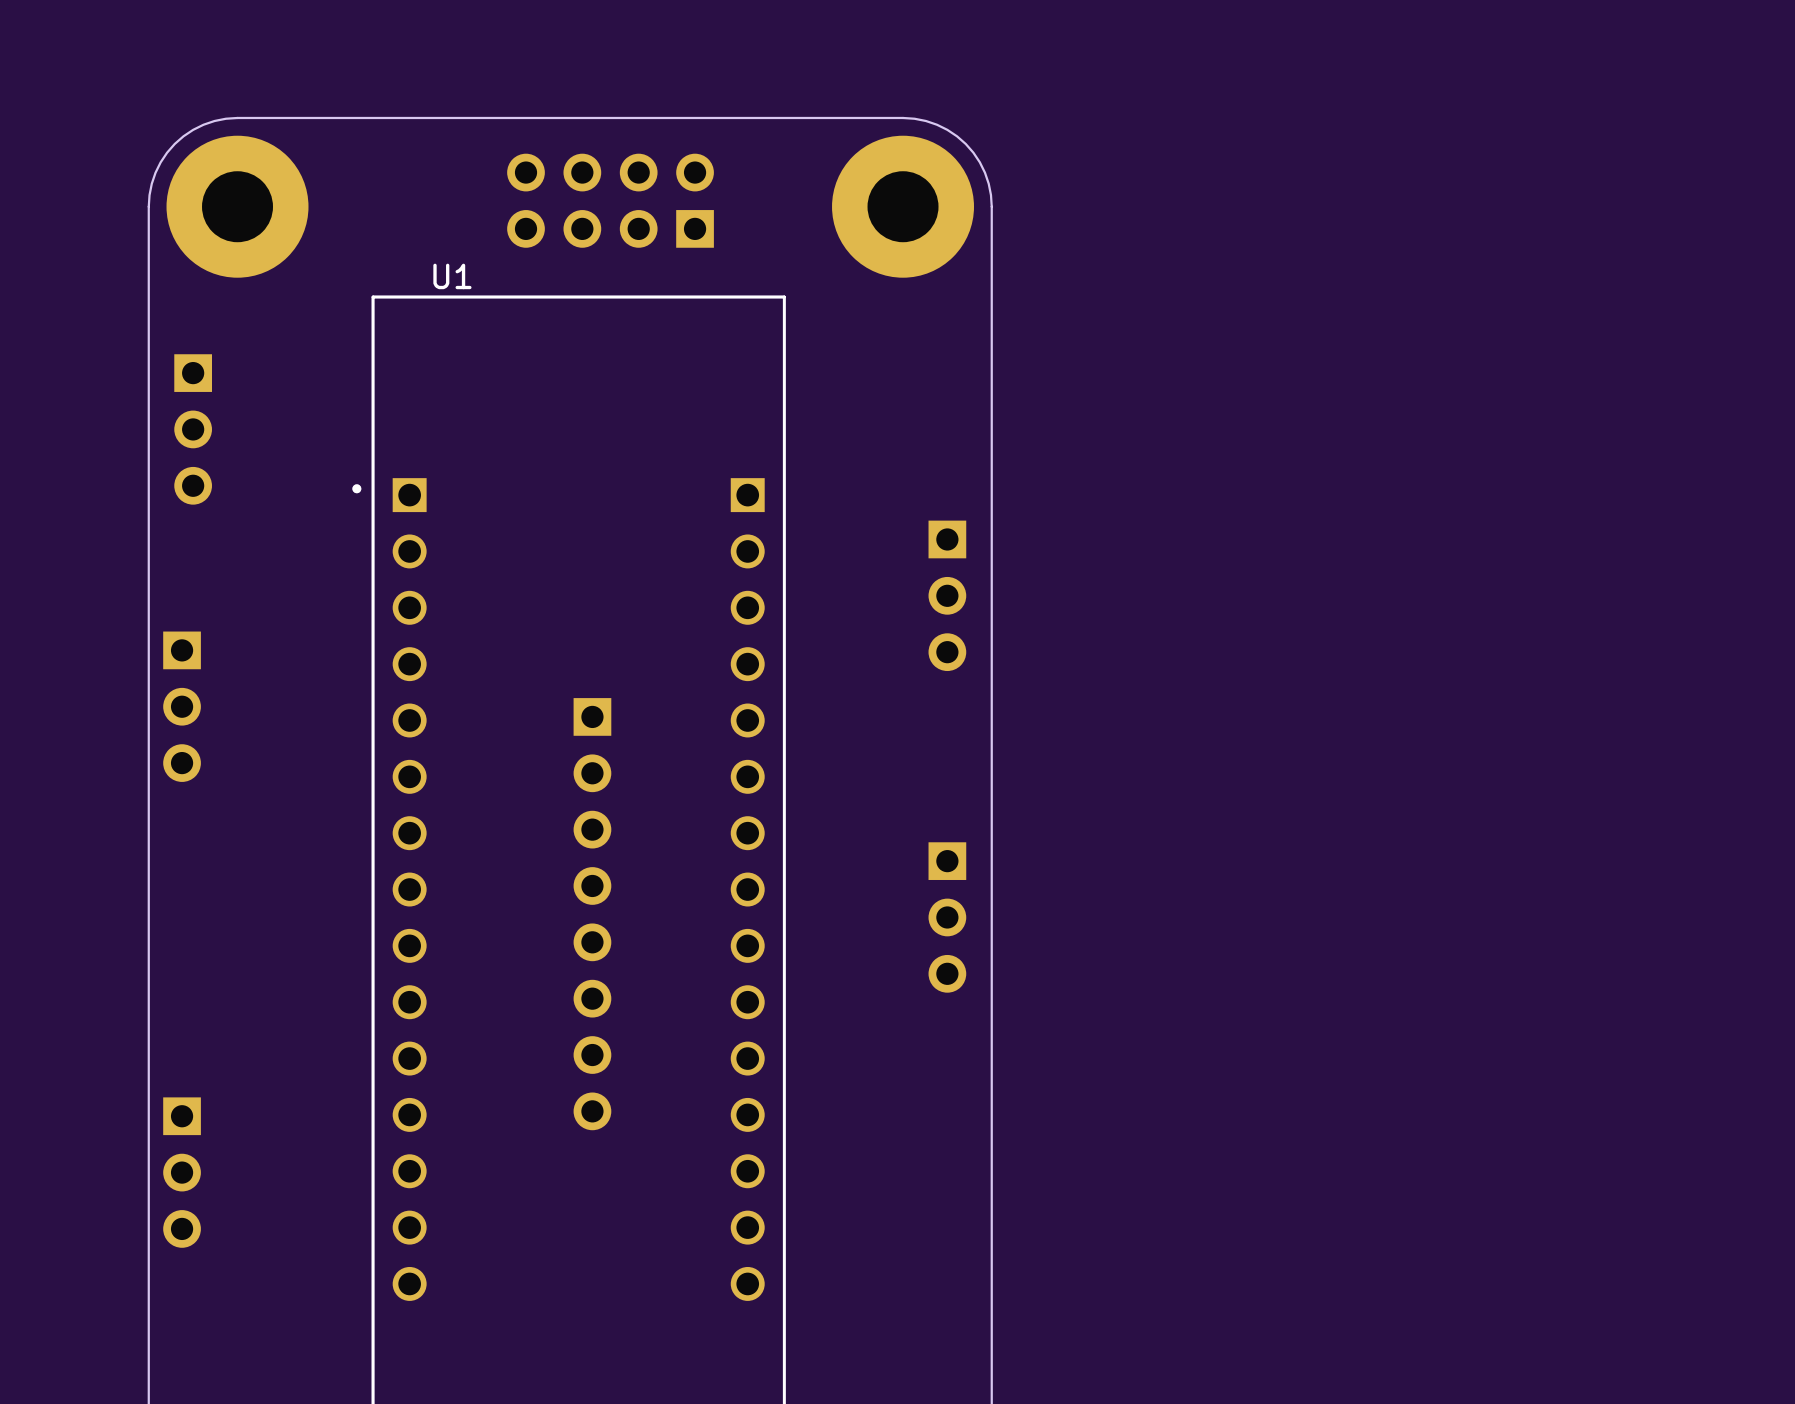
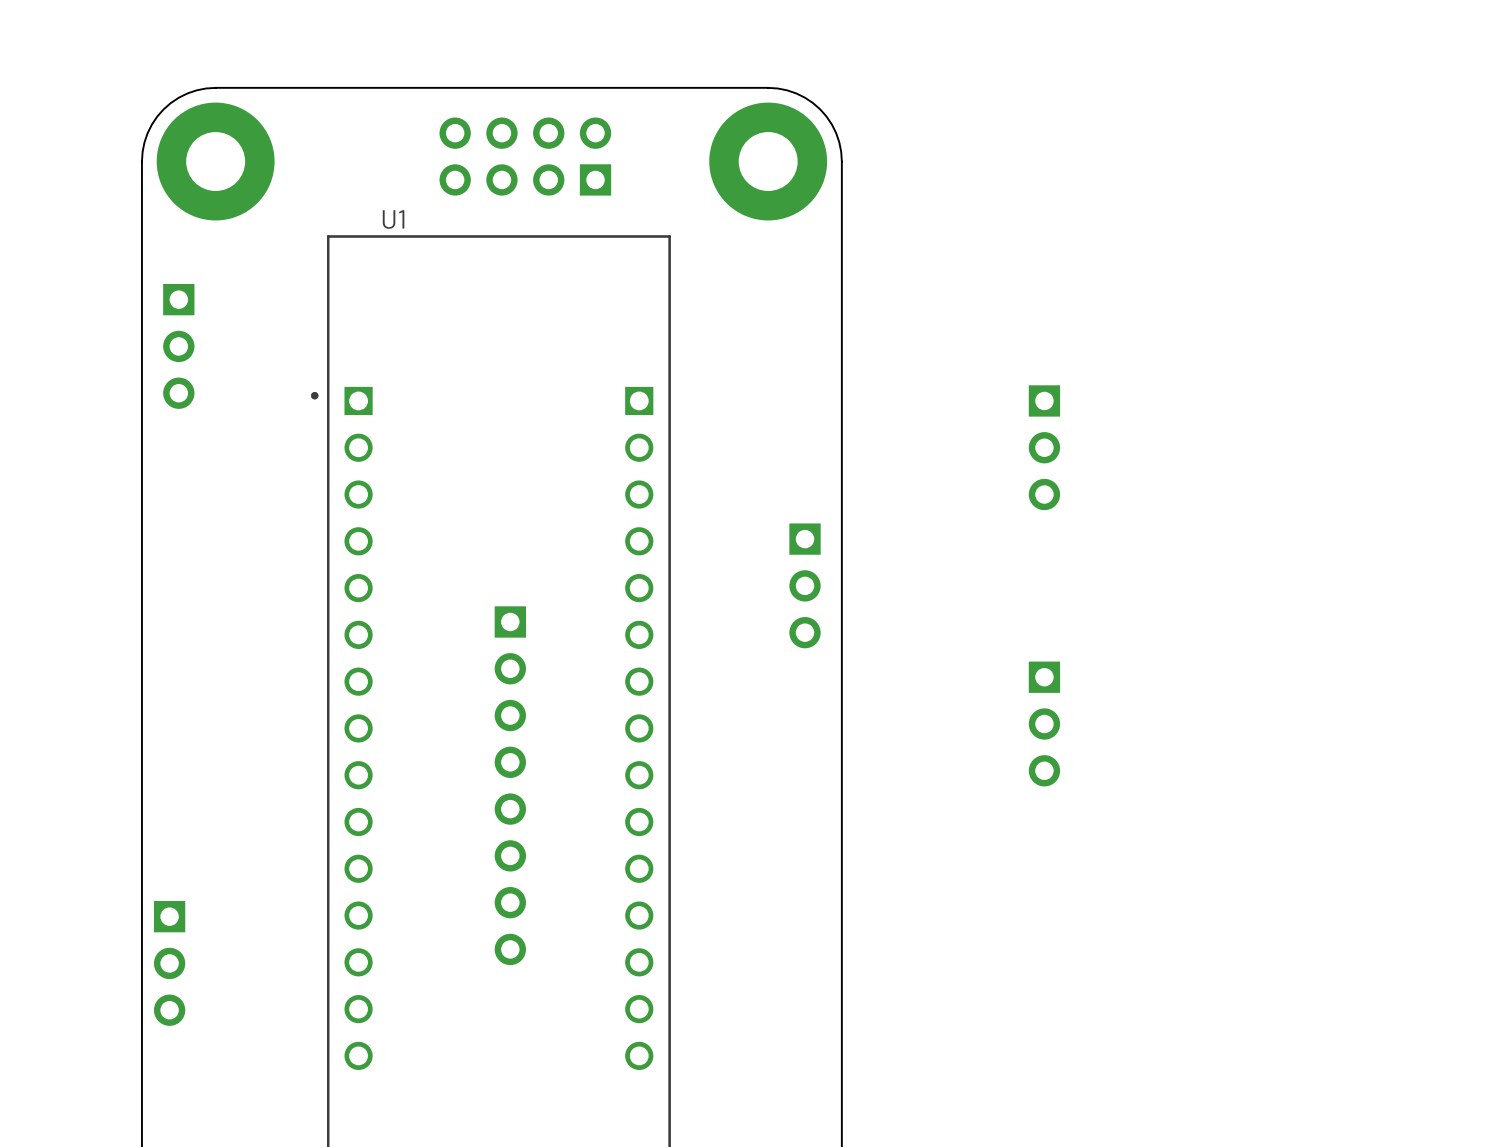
part: none -> (1044, 447)
part: (947, 595) -> none
part: (182, 706) -> none
part: none -> (805, 585)
part: none -> (1044, 724)
part position: (592, 914) -> (510, 785)
part: (947, 917) -> none

